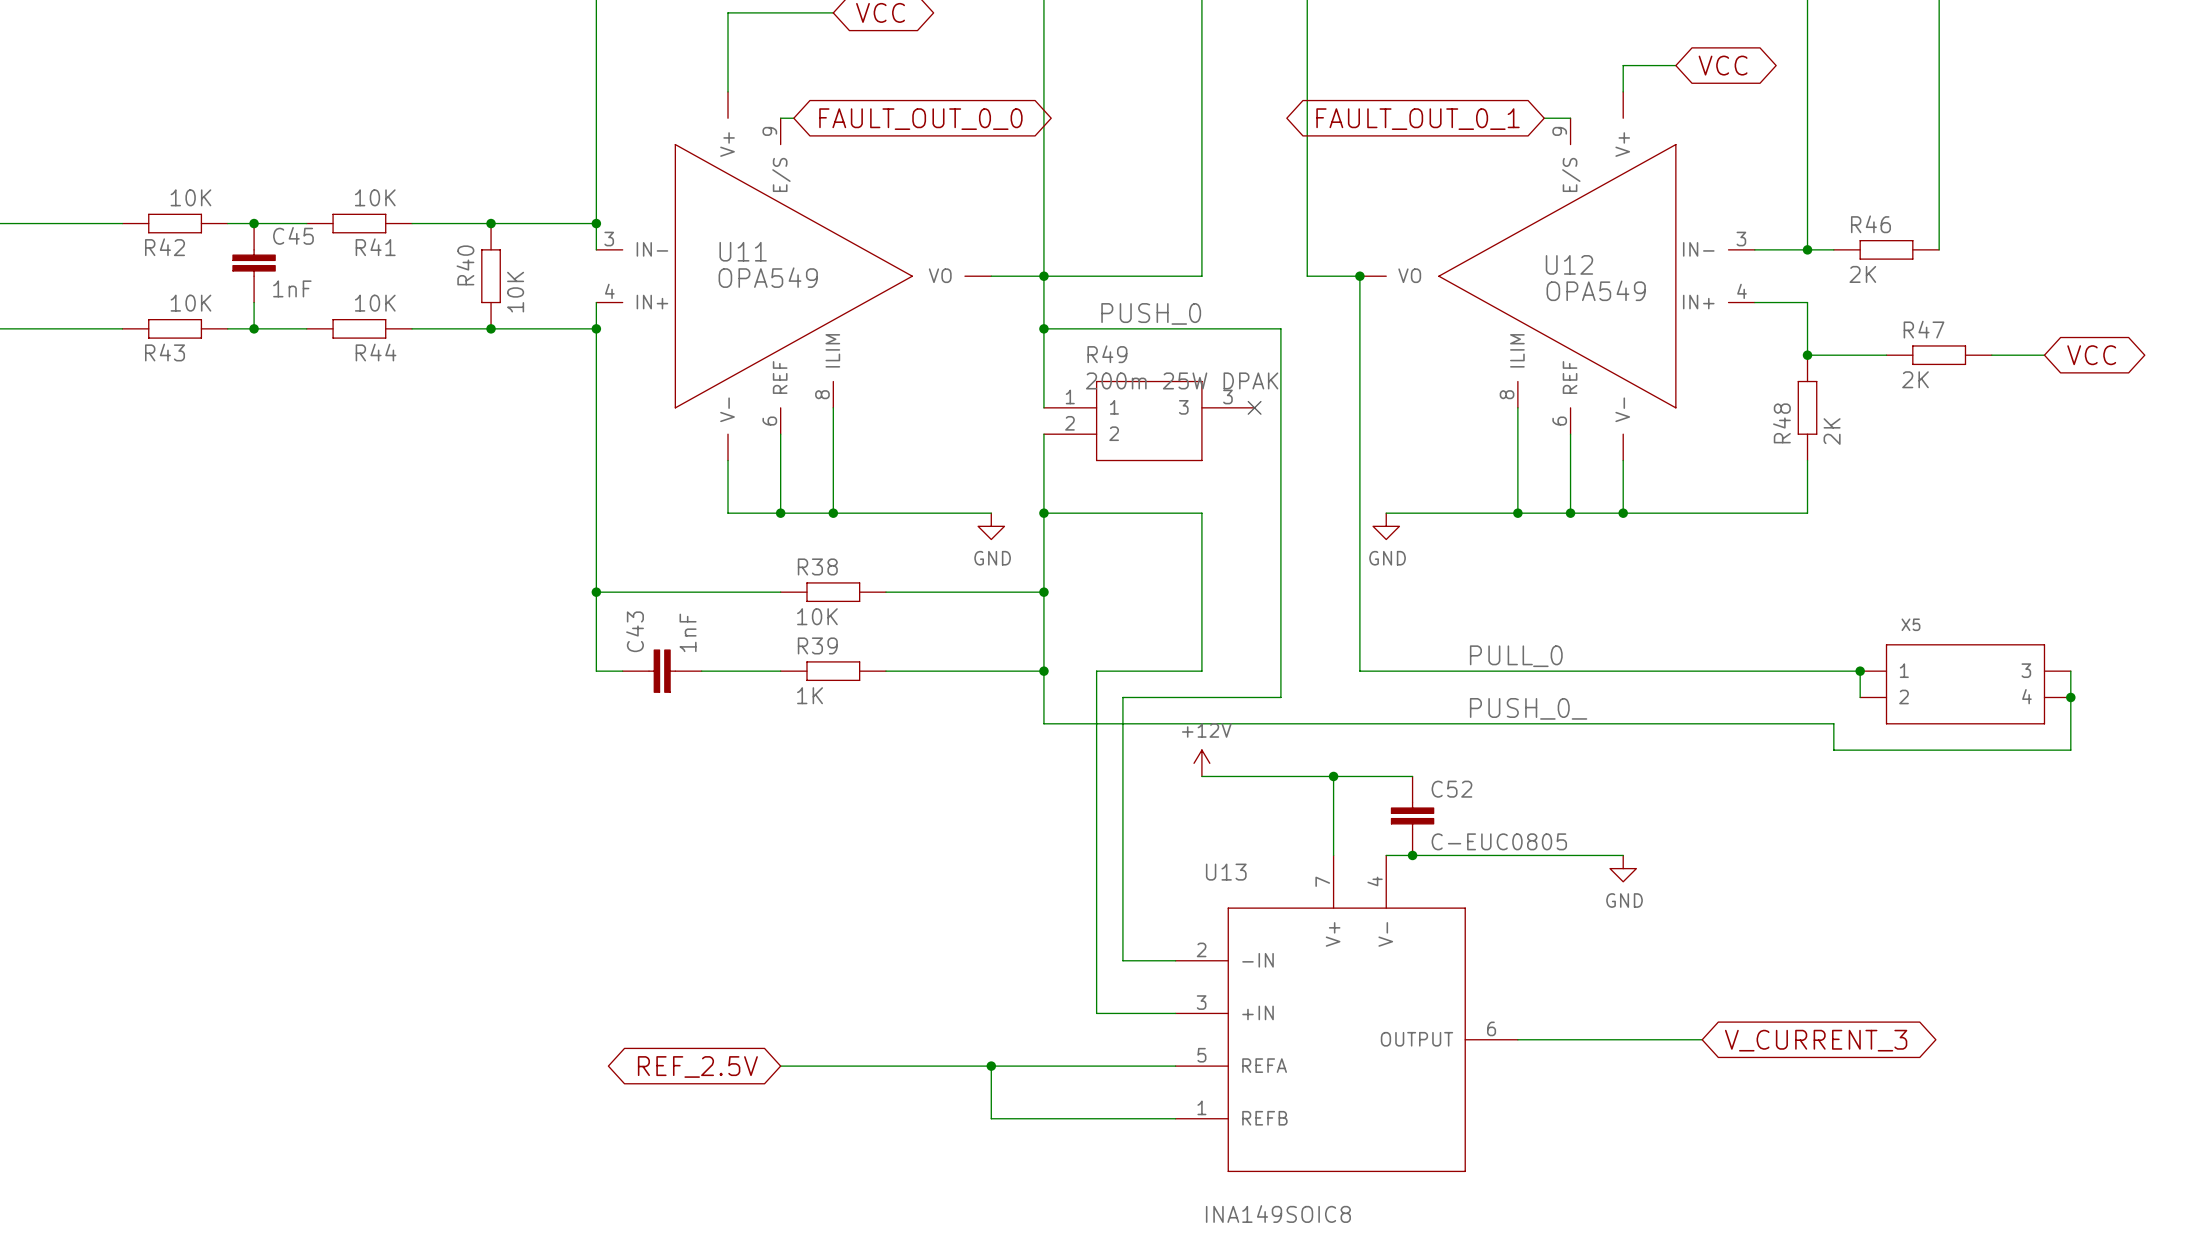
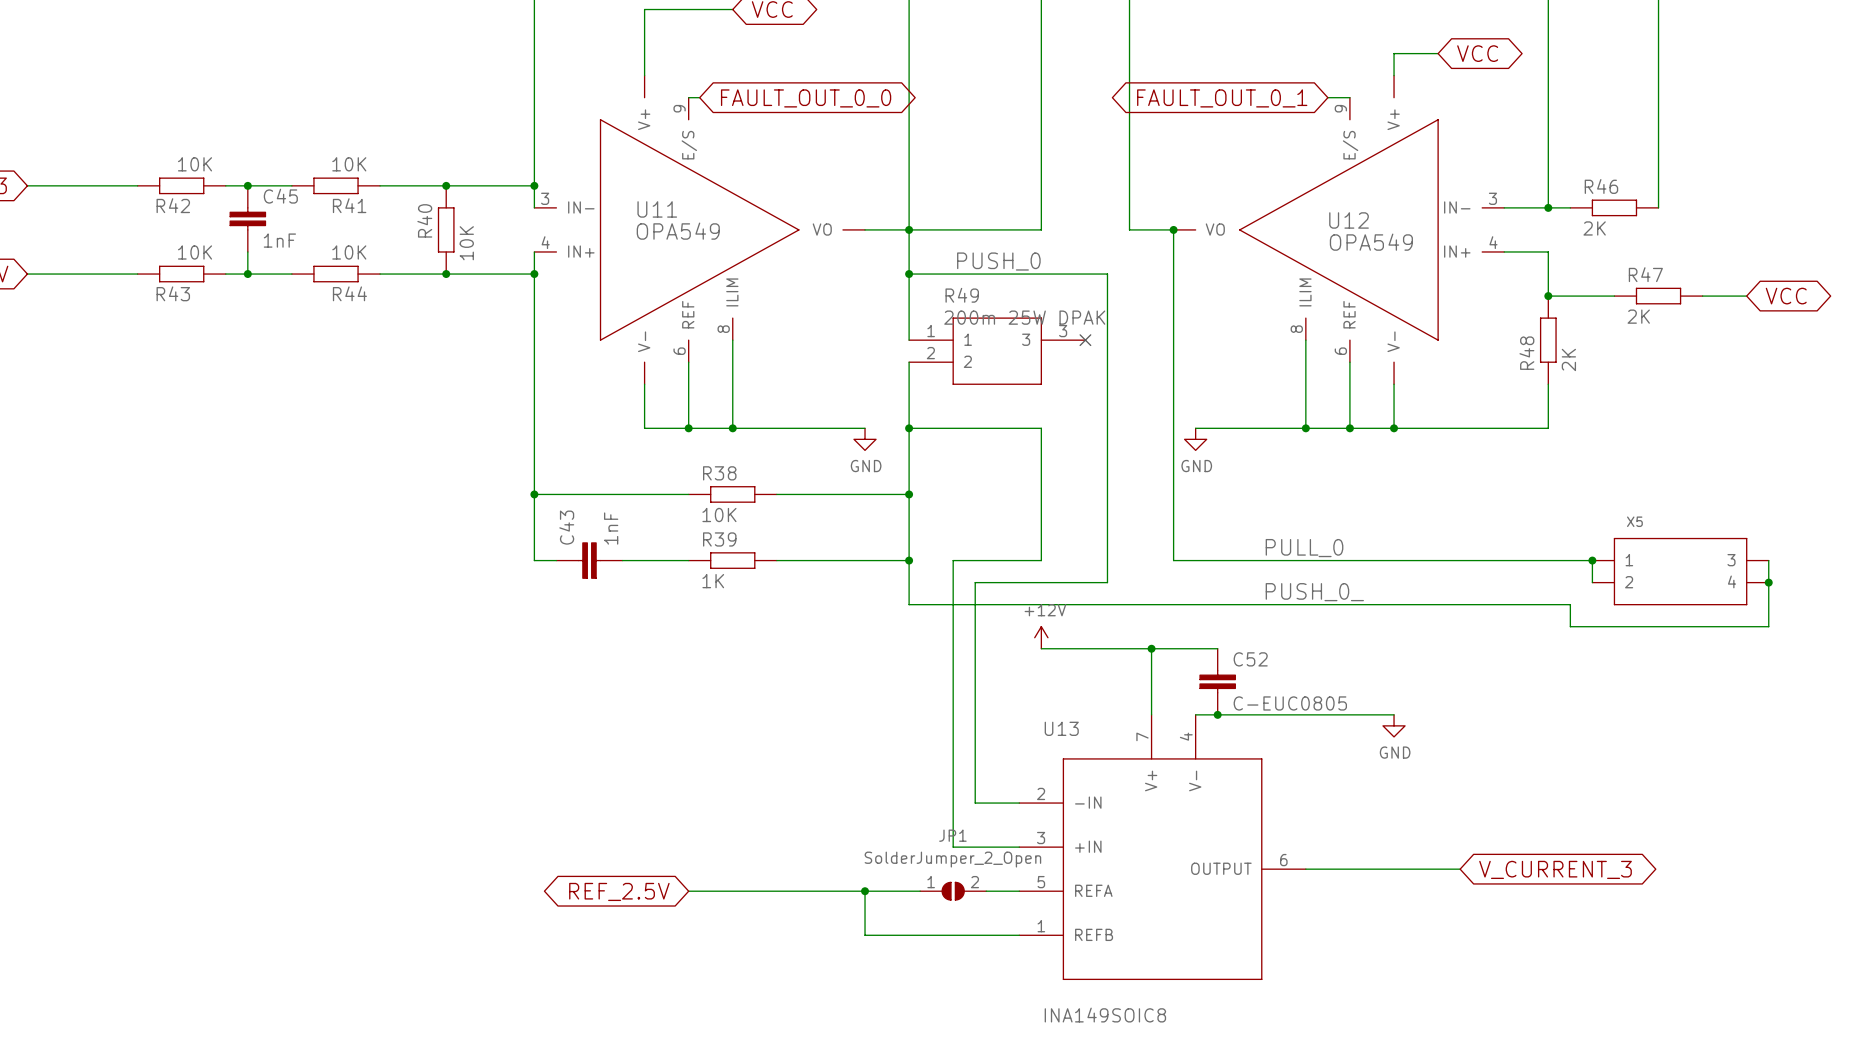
JP1: none -> SolderJumper_2_Open (953, 891)

